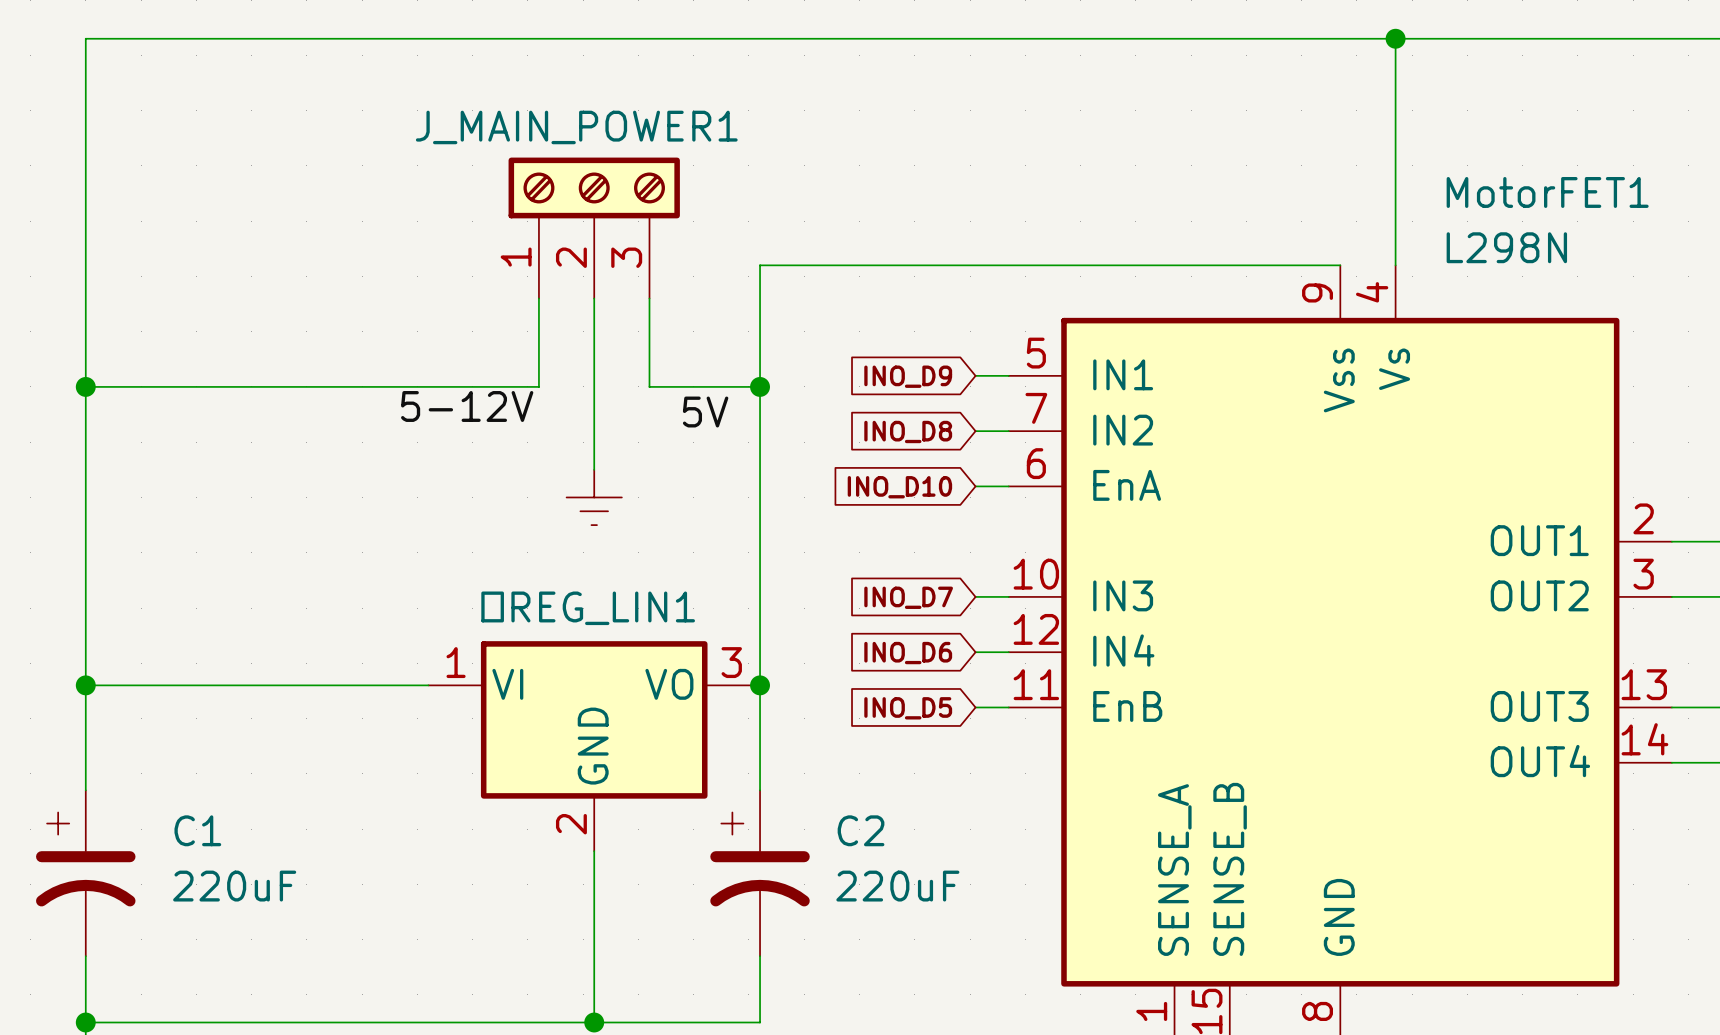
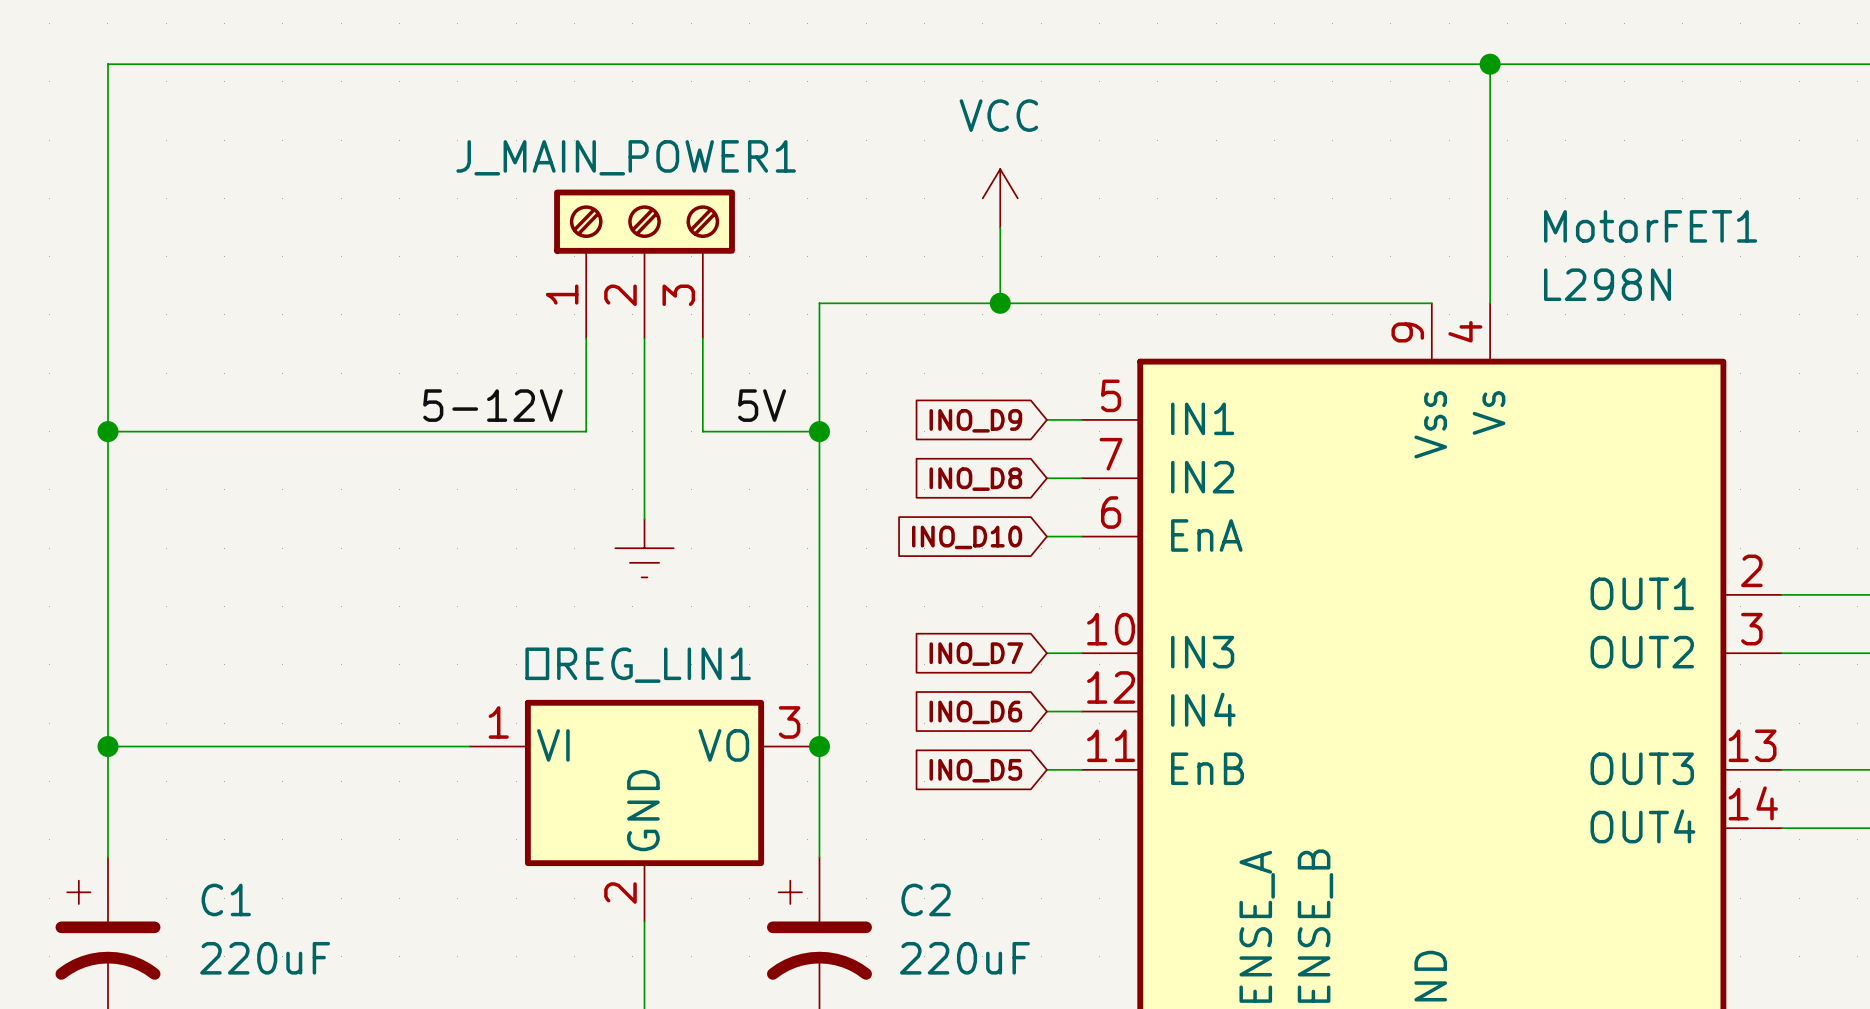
power symbol: none -> VCC (1000, 198)
wire: none -> (1000, 227) (1000, 303)
junction: none -> (1000, 303)
label position: 5-12V (467, 406) -> 5-12V (492, 405)
label position: 5V (705, 412) -> 5V (762, 405)

